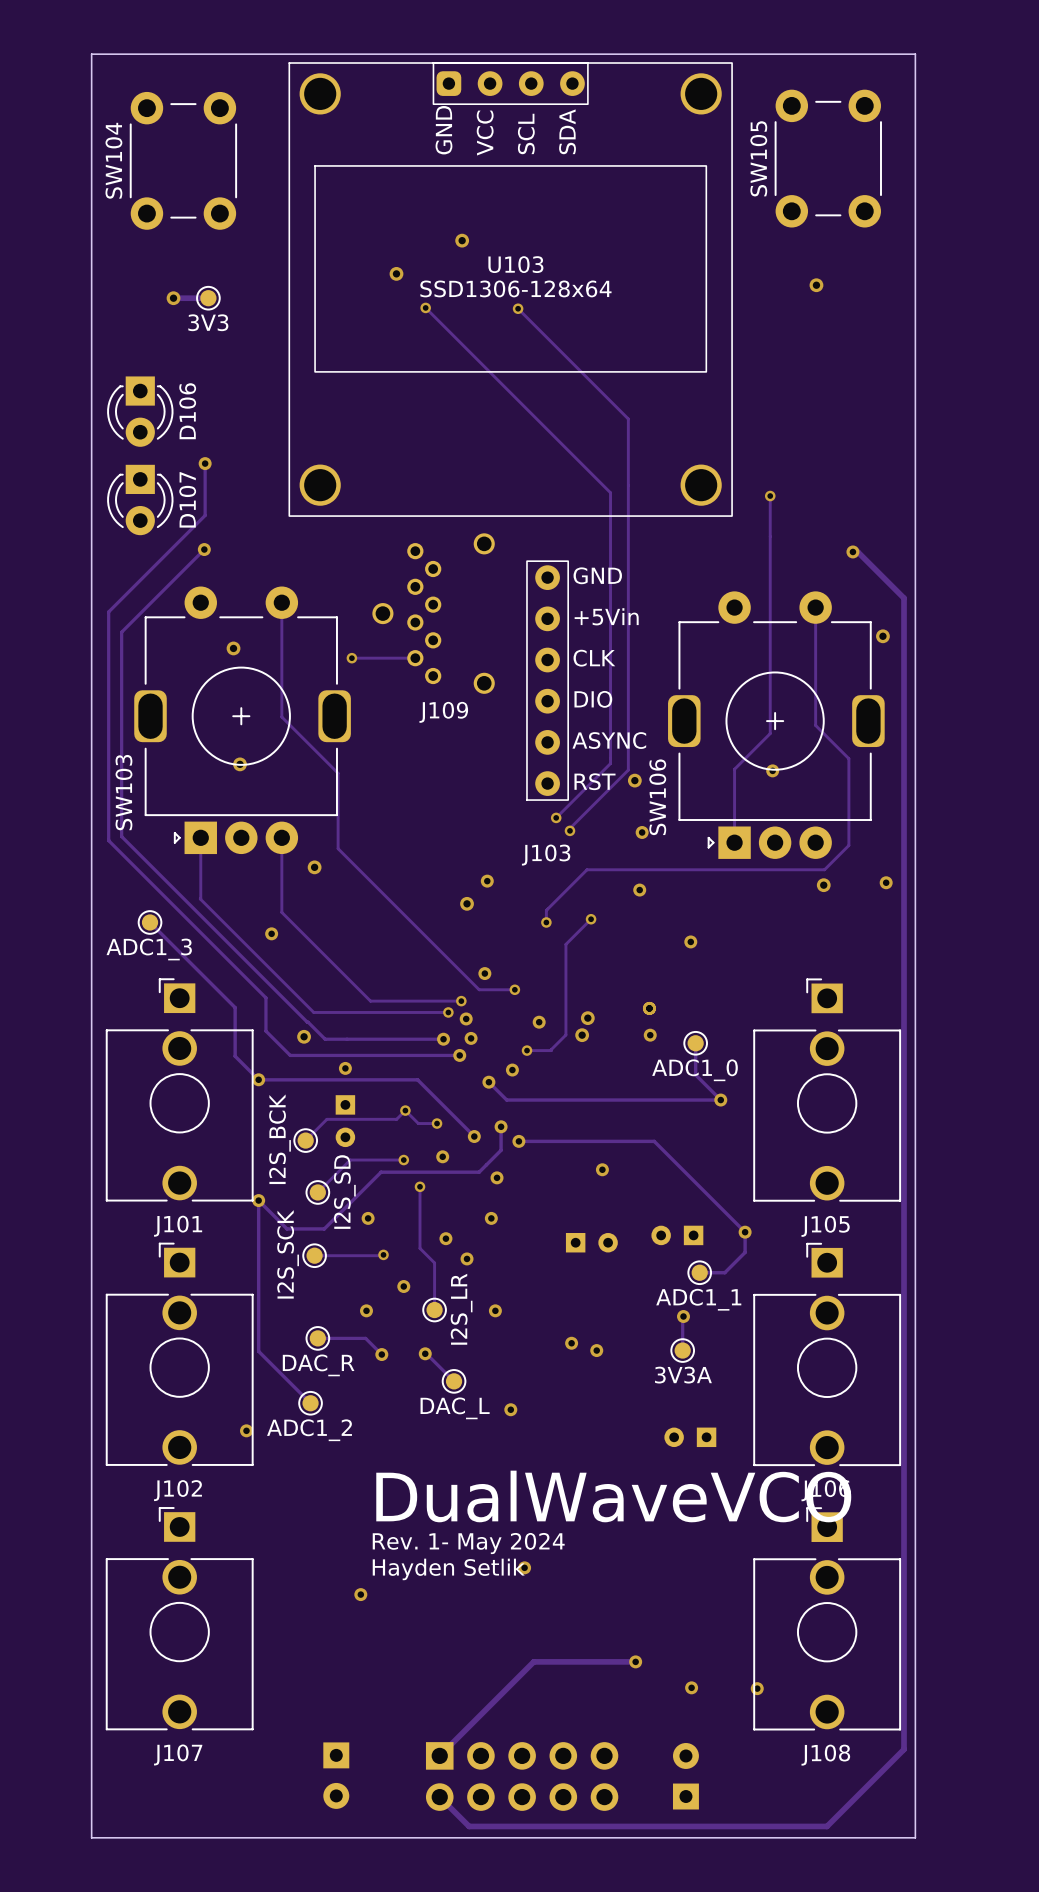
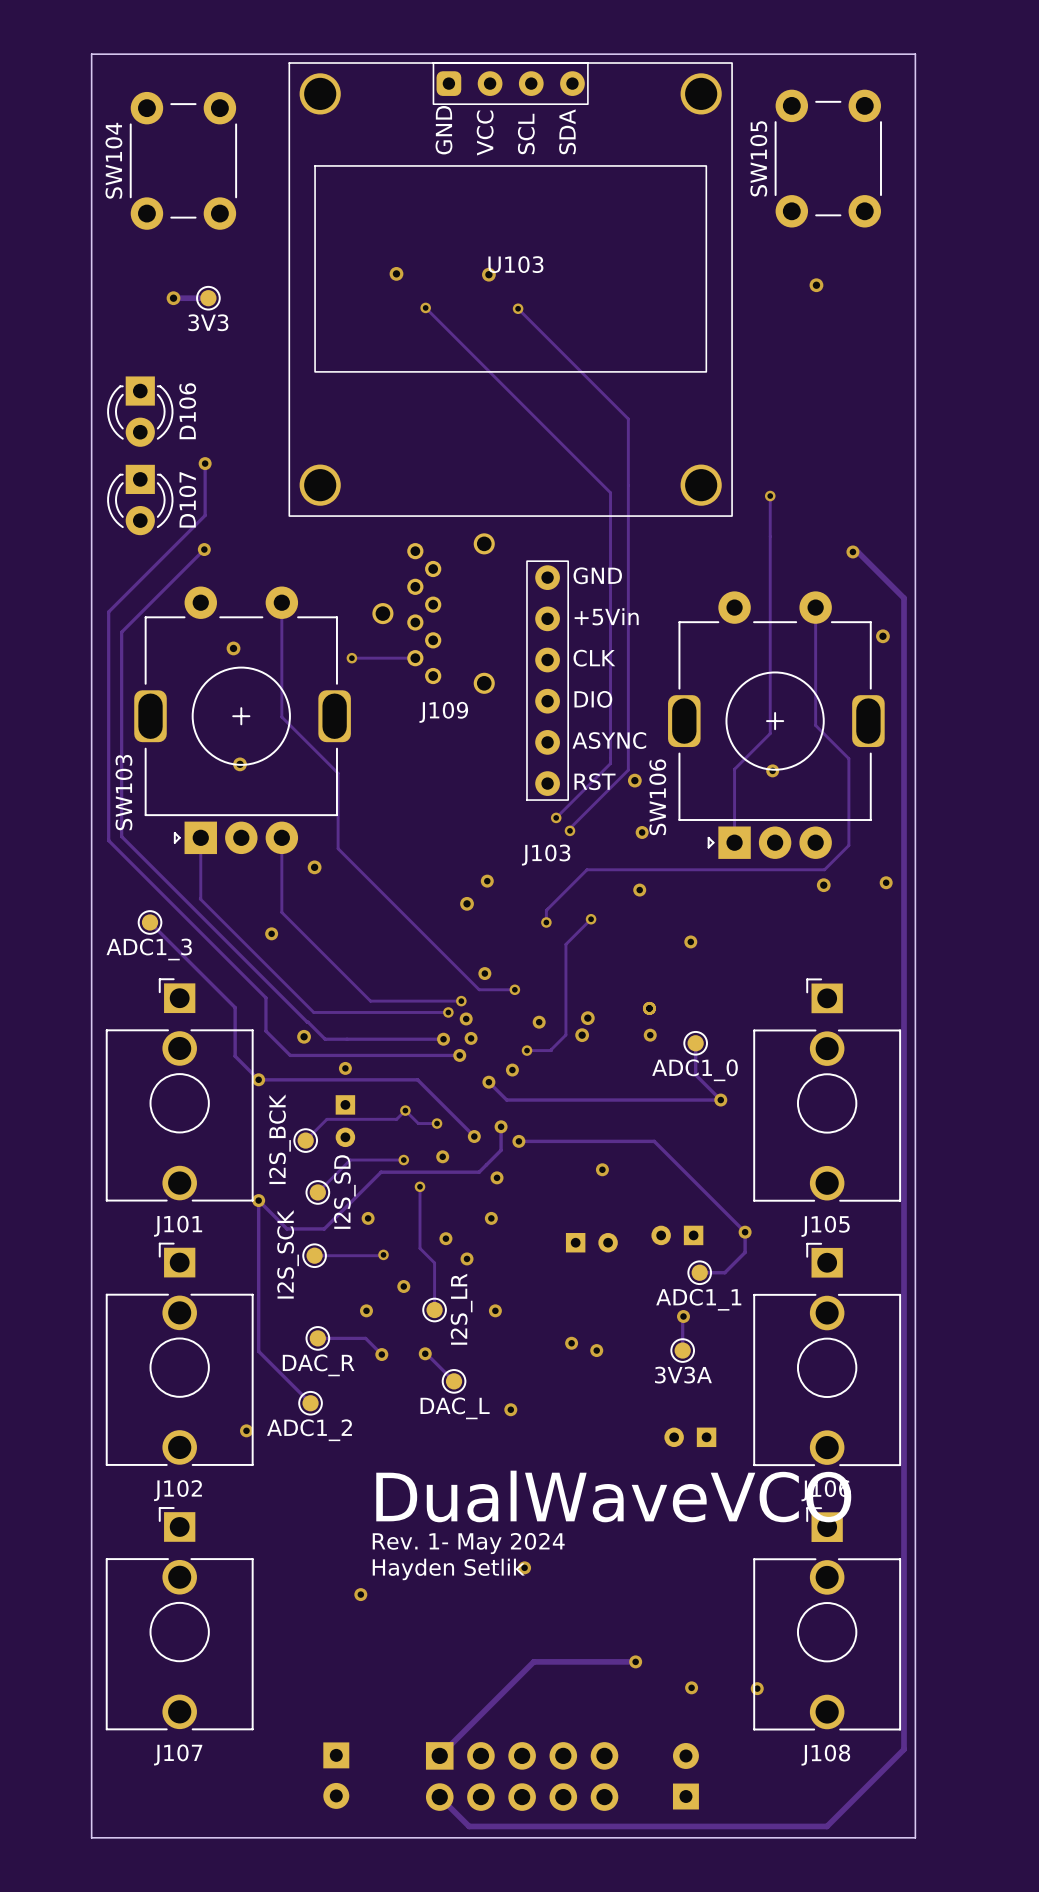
via position: (462, 240) -> (488, 274)
U103 value: SSD1306-128x64 (515, 288) -> none

